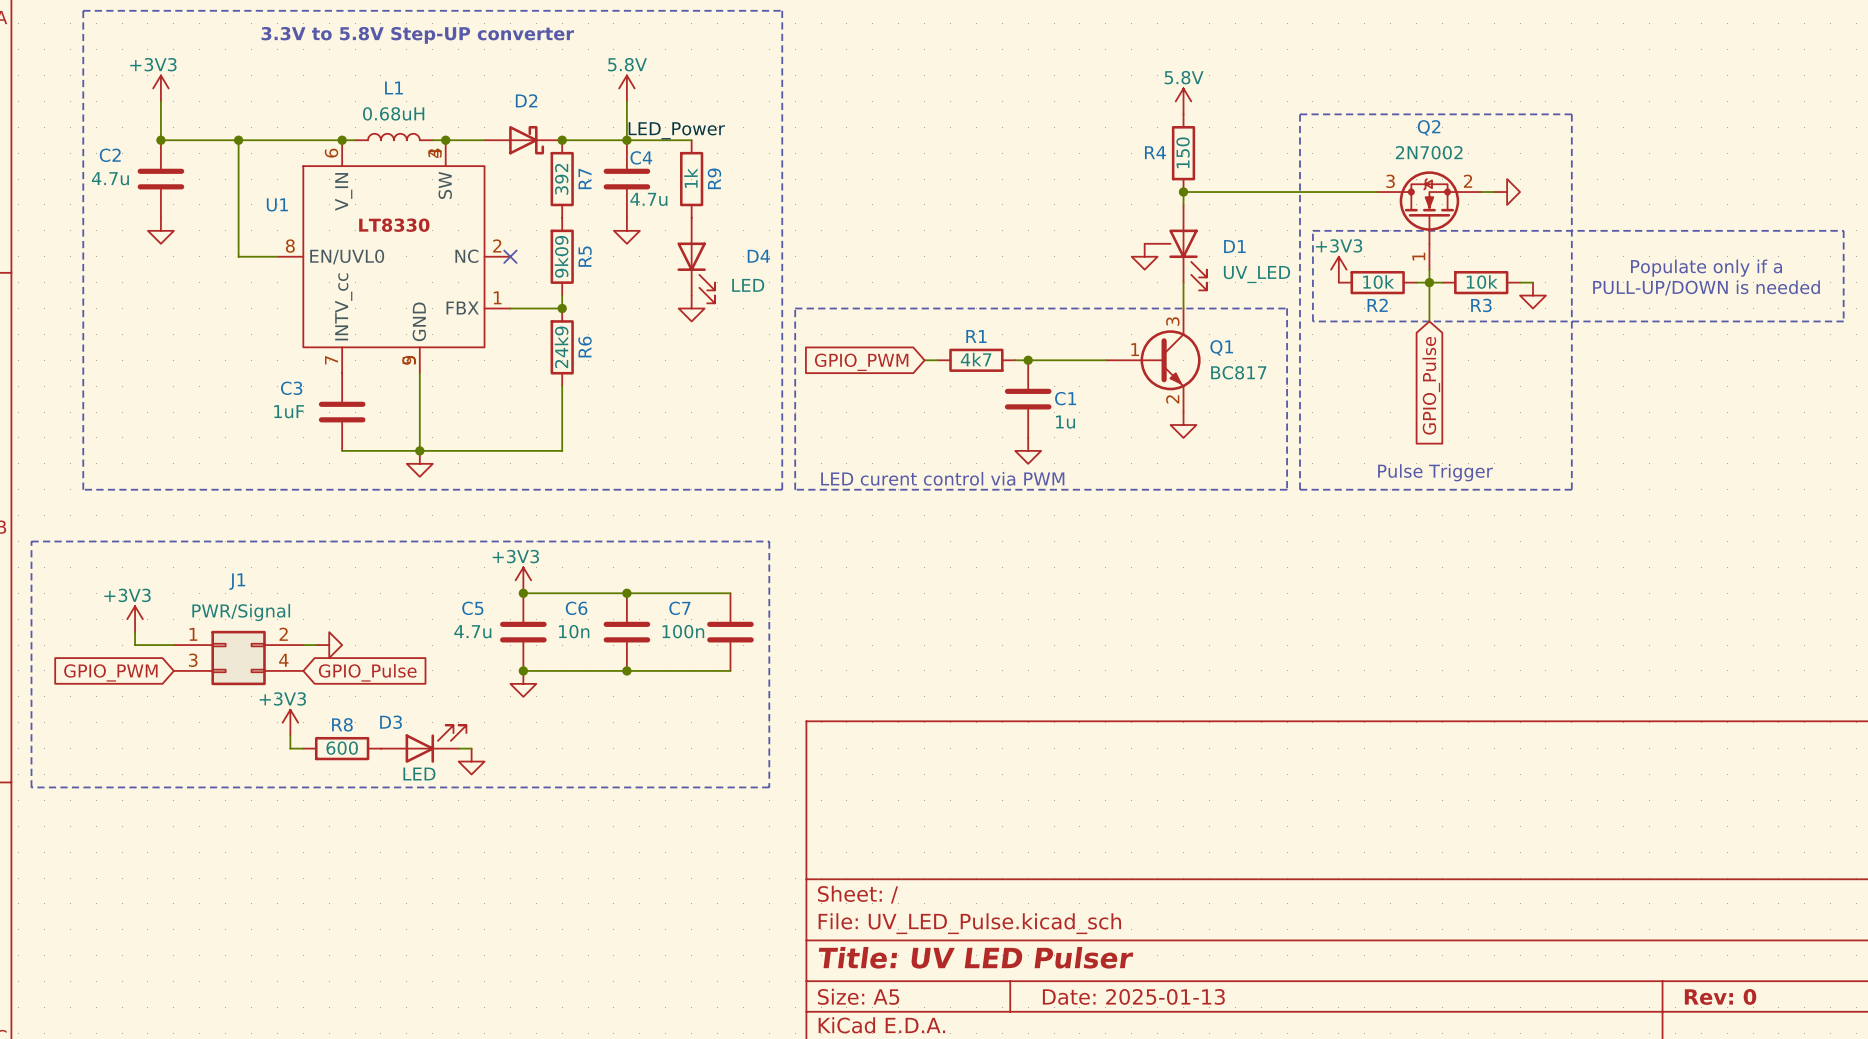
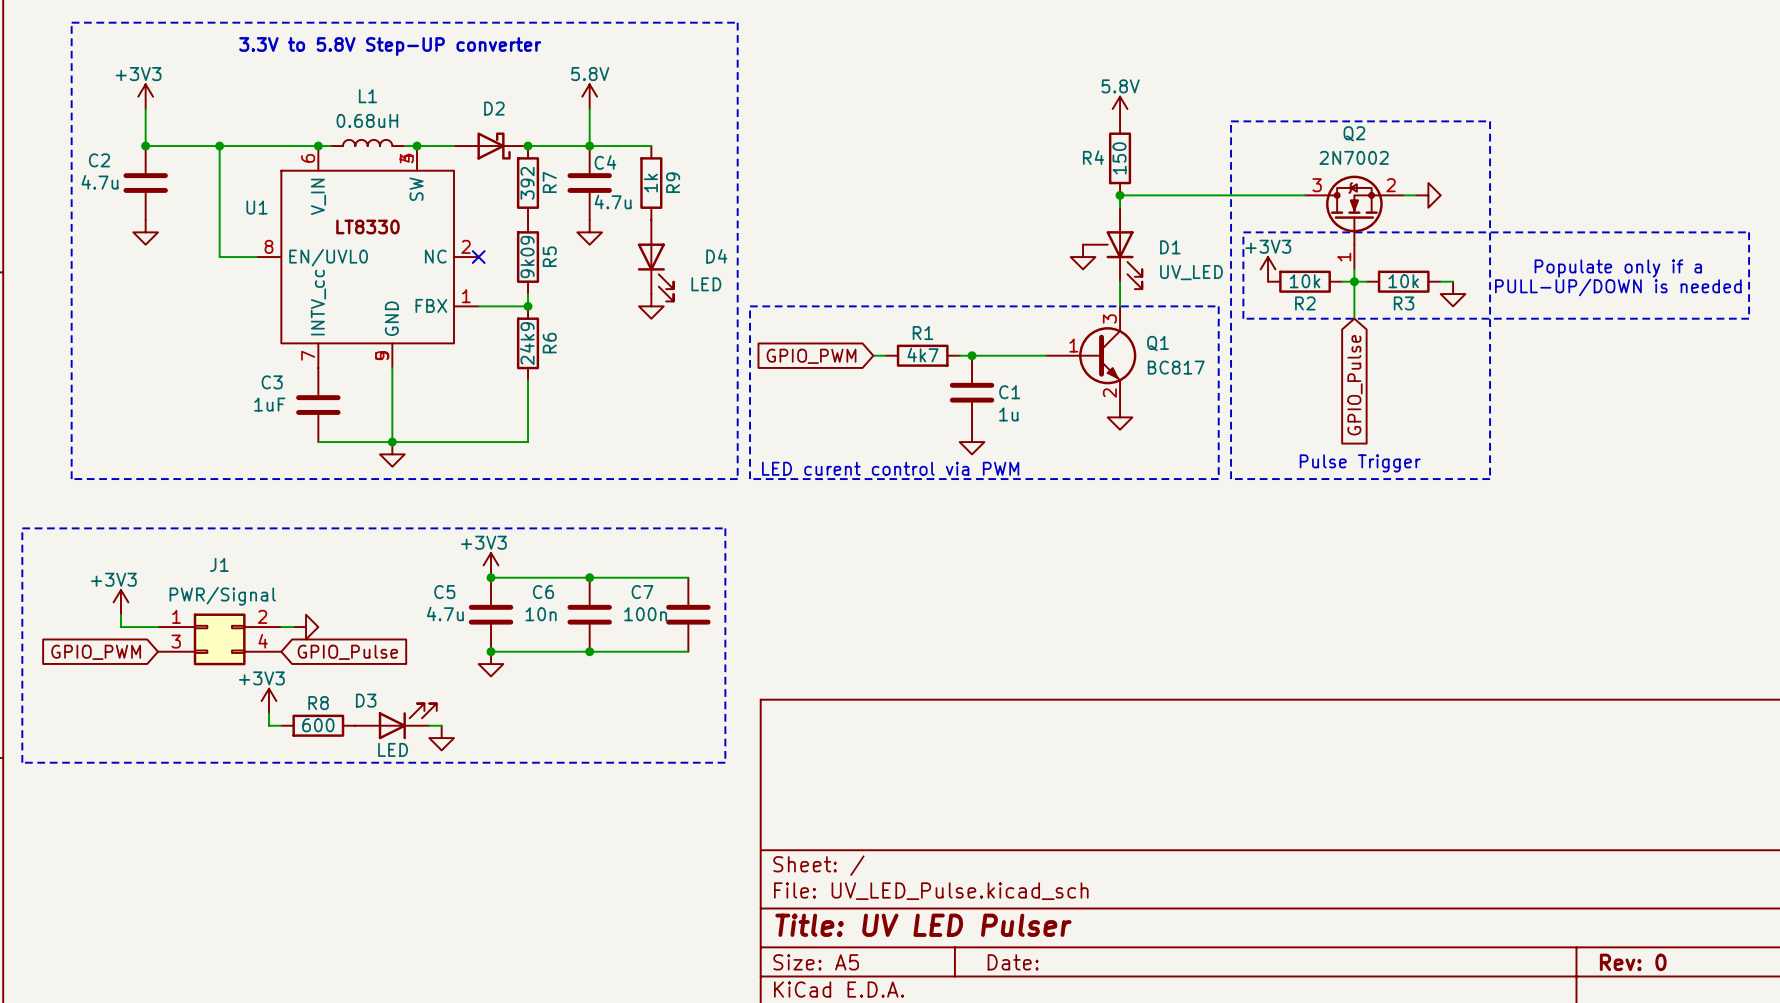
label: LED_Power (676, 130) -> none
title block: Date: 2025-01-13 (1133, 996) -> Date: (1013, 962)

